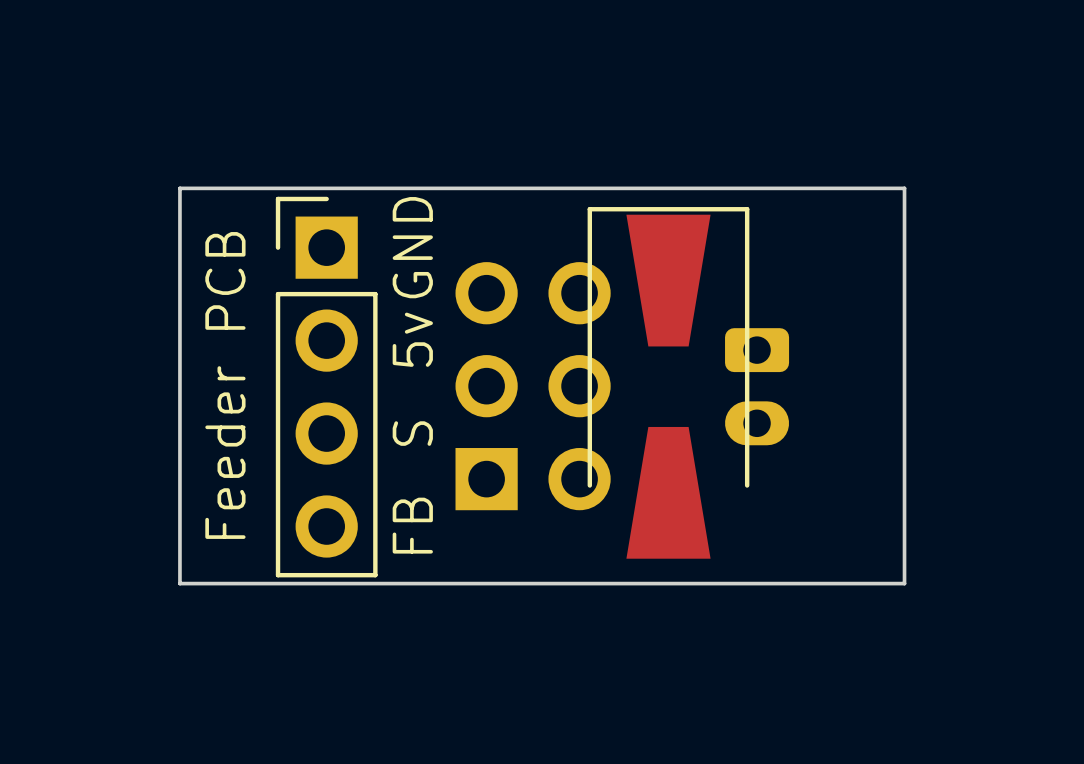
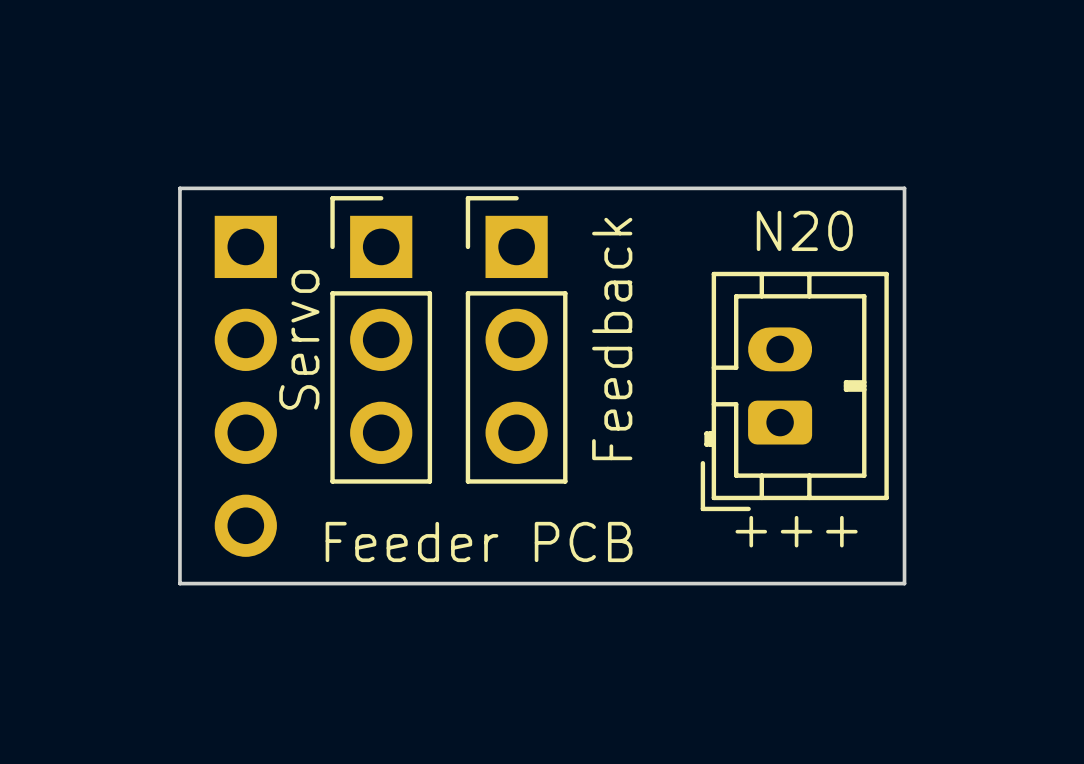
text: GND (412, 247) -> none
part: none -> Servo (381, 339)
text: 5v (412, 339) -> none
part: none -> Feedback (516, 339)
part: (668, 382) -> none
text rotation: 0° (225, 385) -> 90° clockwise (479, 541)
part: (533, 386) -> none
part side: bottom (757, 386) -> top (794, 391)
part side: top (326, 387) -> bottom (245, 386)
text: S (412, 433) -> none
text: FB (412, 525) -> none
text: none -> +++ (796, 531)

